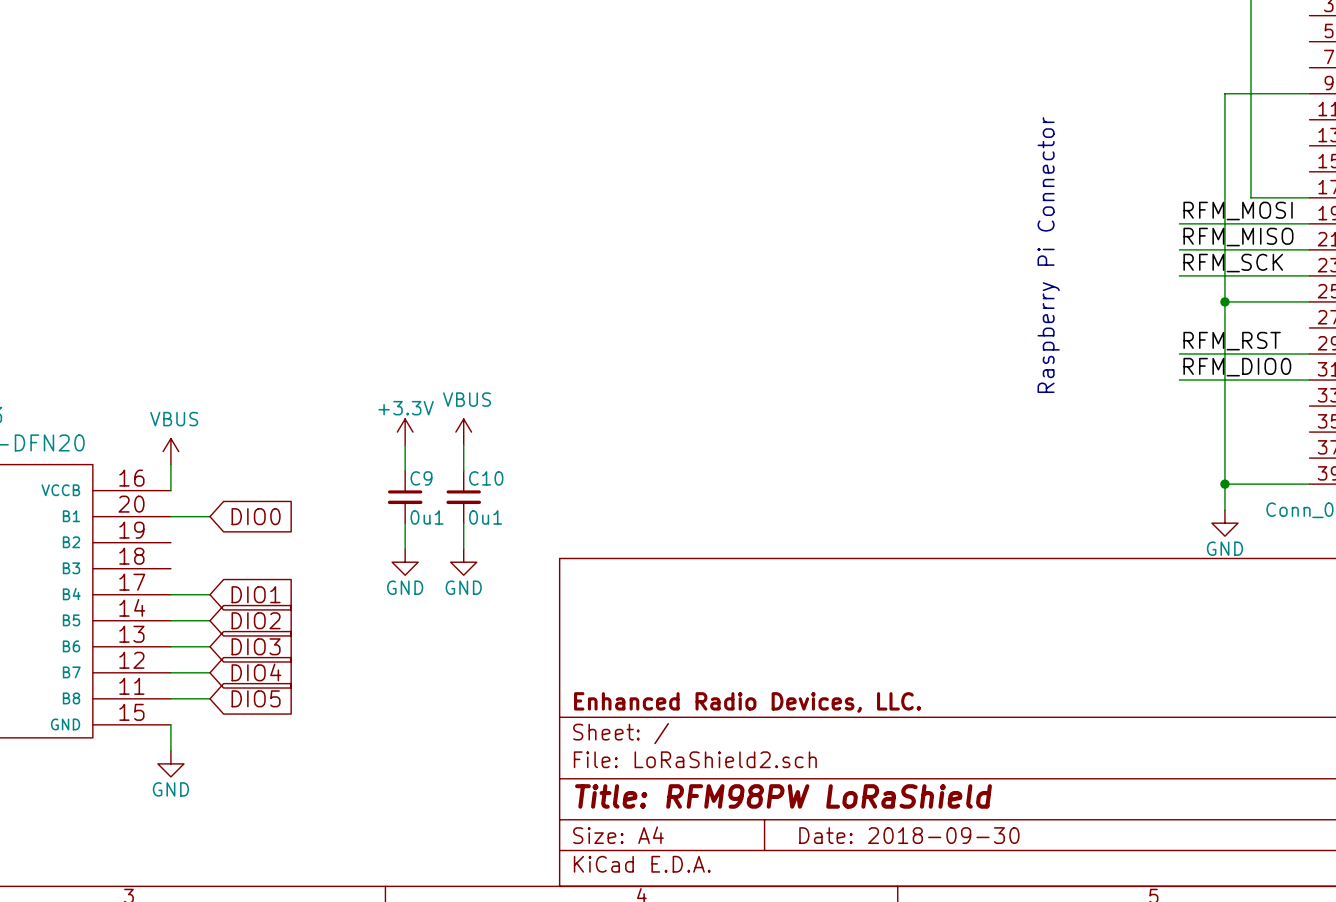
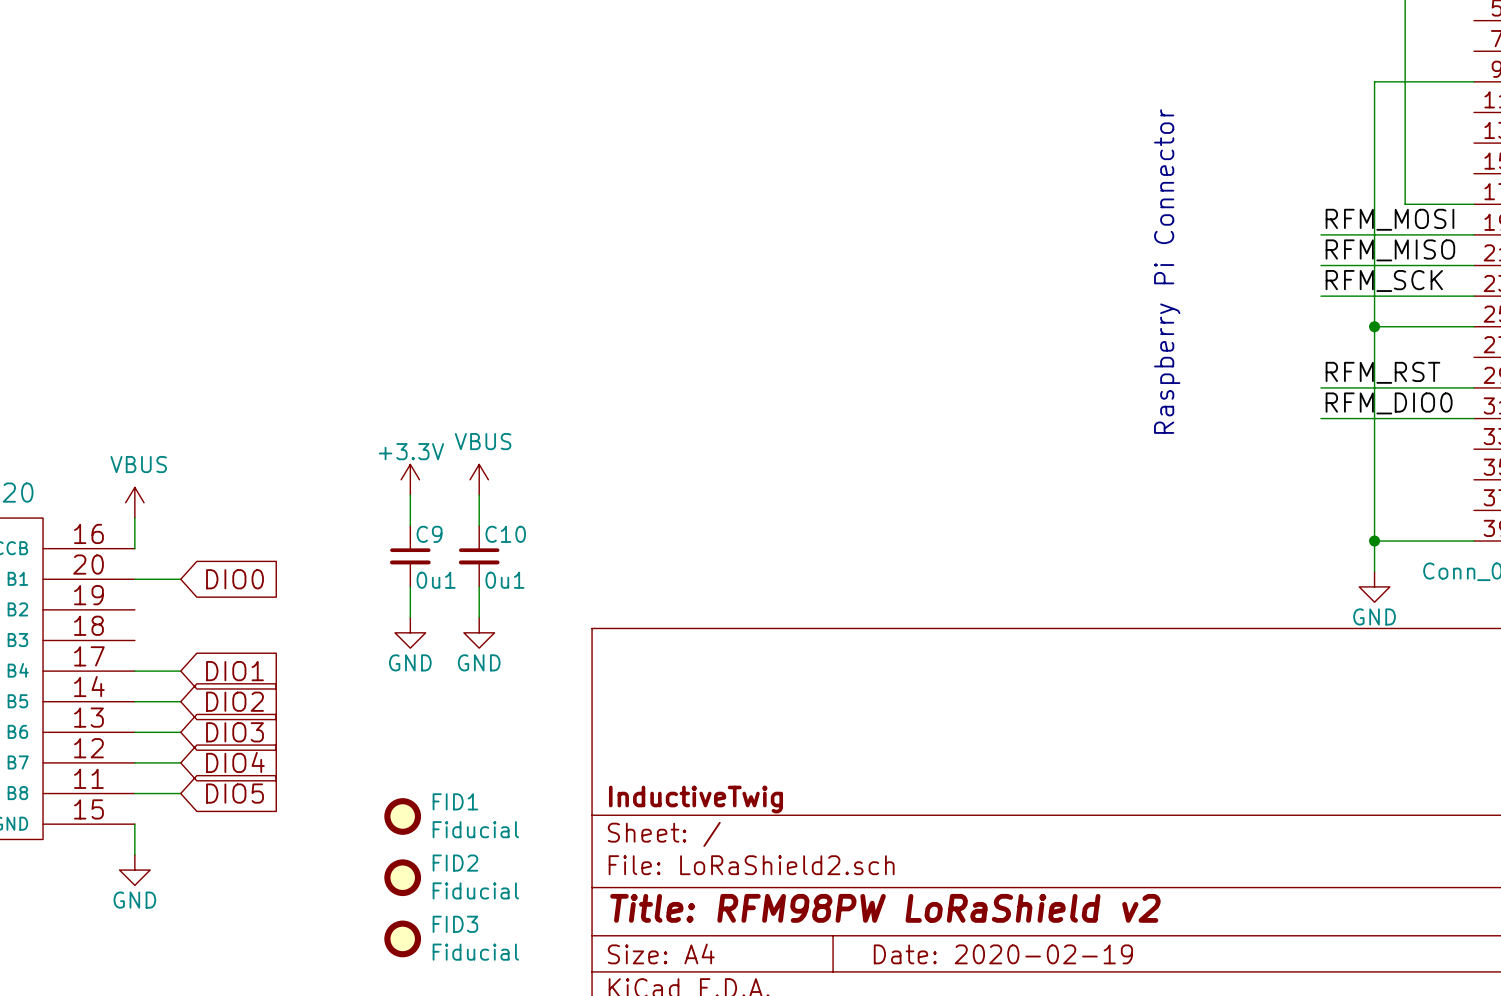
title block: Enhanced Radio Devices, LLC. (747, 702) -> InductiveTwig (695, 799)
FID1: none -> Fiducial (402, 816)
FID2: none -> Fiducial (402, 877)
title block: Title: RFM98PW LoRaShield (783, 796) -> Title: RFM98PW LoRaShield v2 (885, 908)
FID3: none -> Fiducial (402, 938)
title block: Date: 2018-09-30 (909, 835) -> Date: 2020-02-19 (1003, 954)

